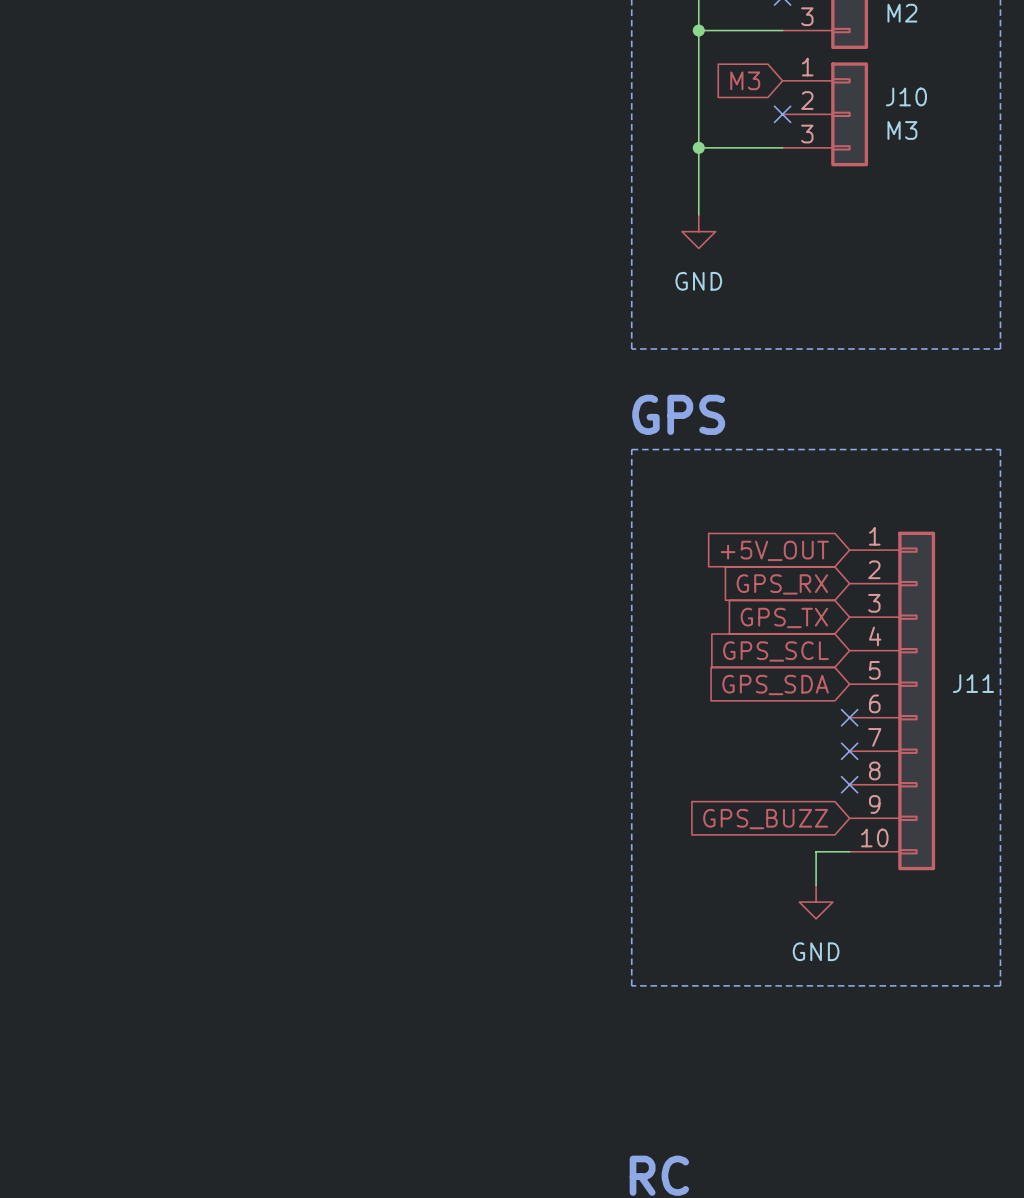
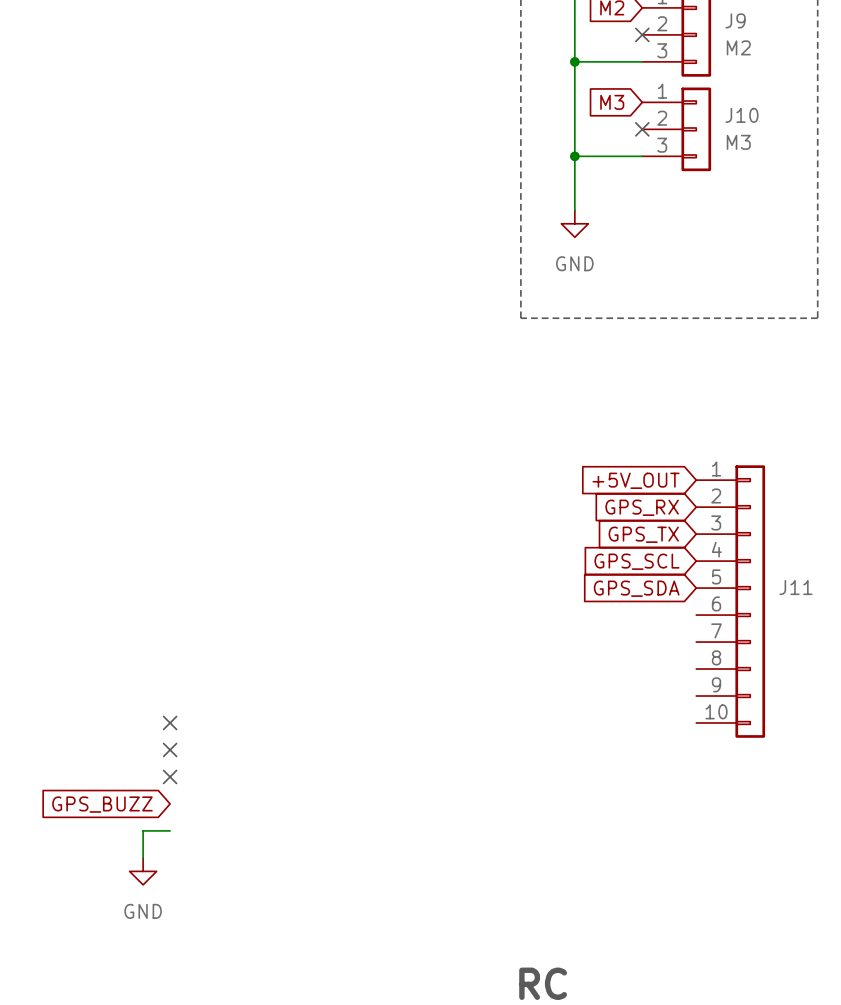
text: GPS (678, 414) -> none
line: (631, 449) (1000, 449) (1000, 985) (631, 985) (631, 449) -> none
no-connect mark: (849, 717) -> none
no-connect mark: (849, 751) -> none
no-connect mark: (849, 784) -> none
global label: GPS_BUZZ (765, 819) -> none
no-connect mark: none -> (170, 722)
wire: (849, 851) (816, 851) (816, 885) -> none
no-connect mark: none -> (170, 749)
power symbol: GND (816, 902) -> none
no-connect mark: none -> (170, 776)
global label: none -> GPS_BUZZ (102, 804)
wire: none -> (170, 830) (143, 830) (143, 857)
power symbol: none -> GND (143, 871)

